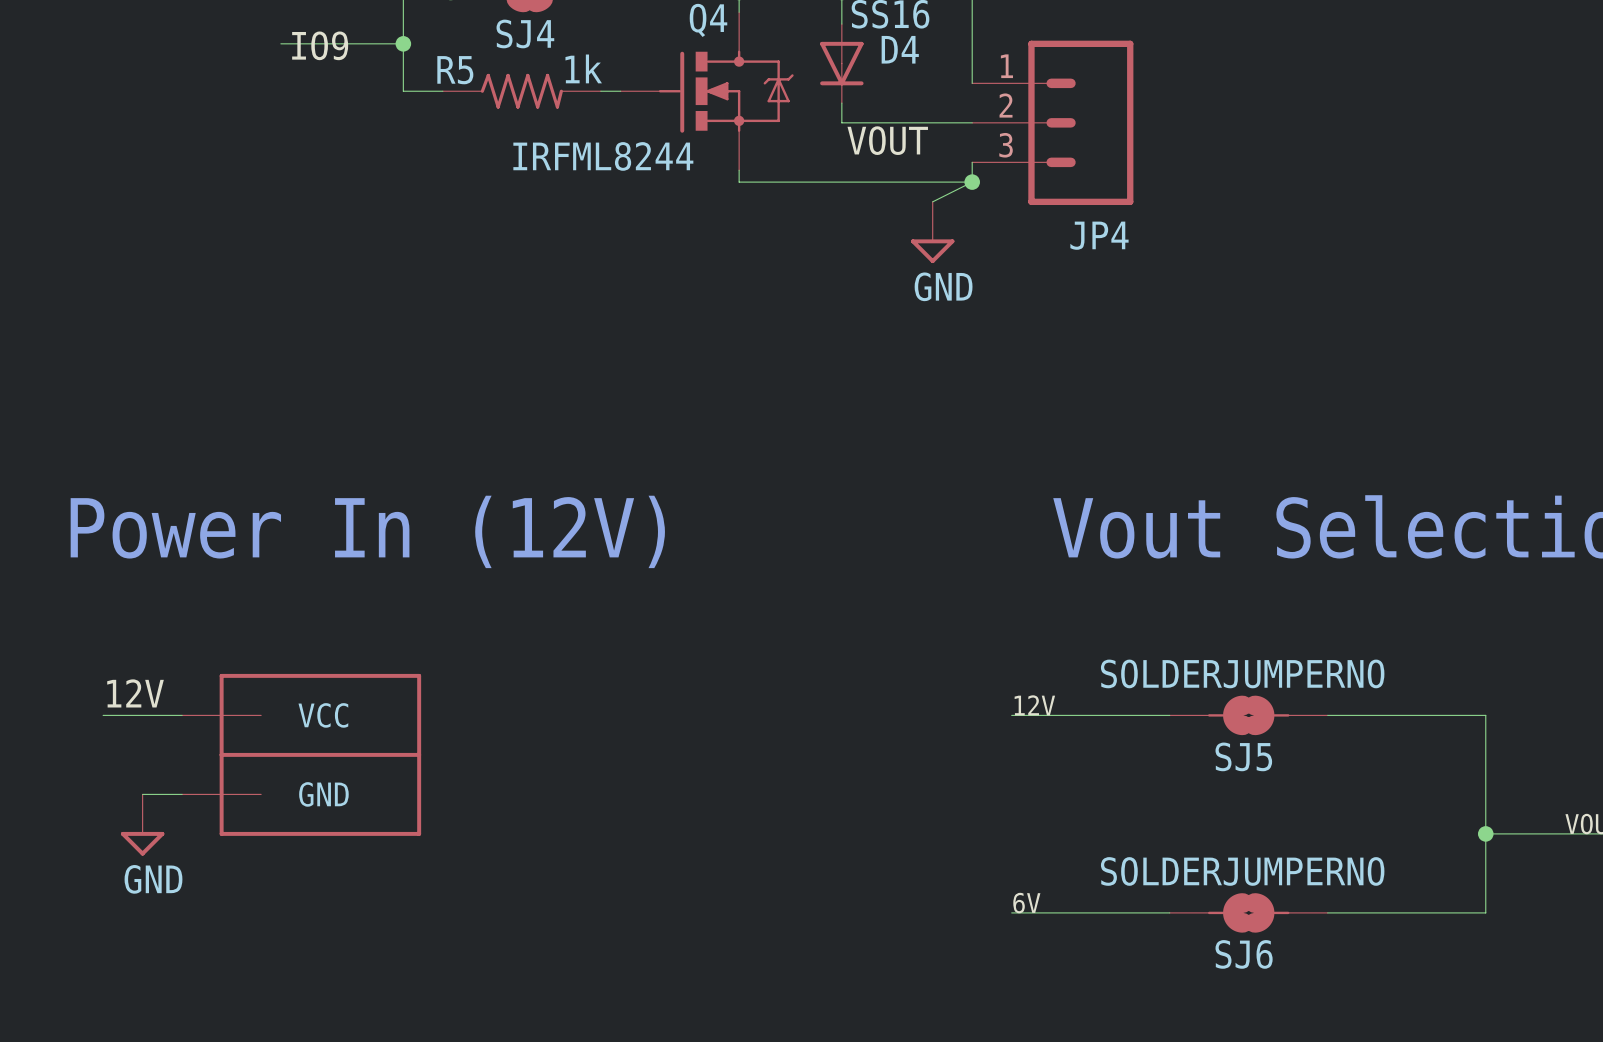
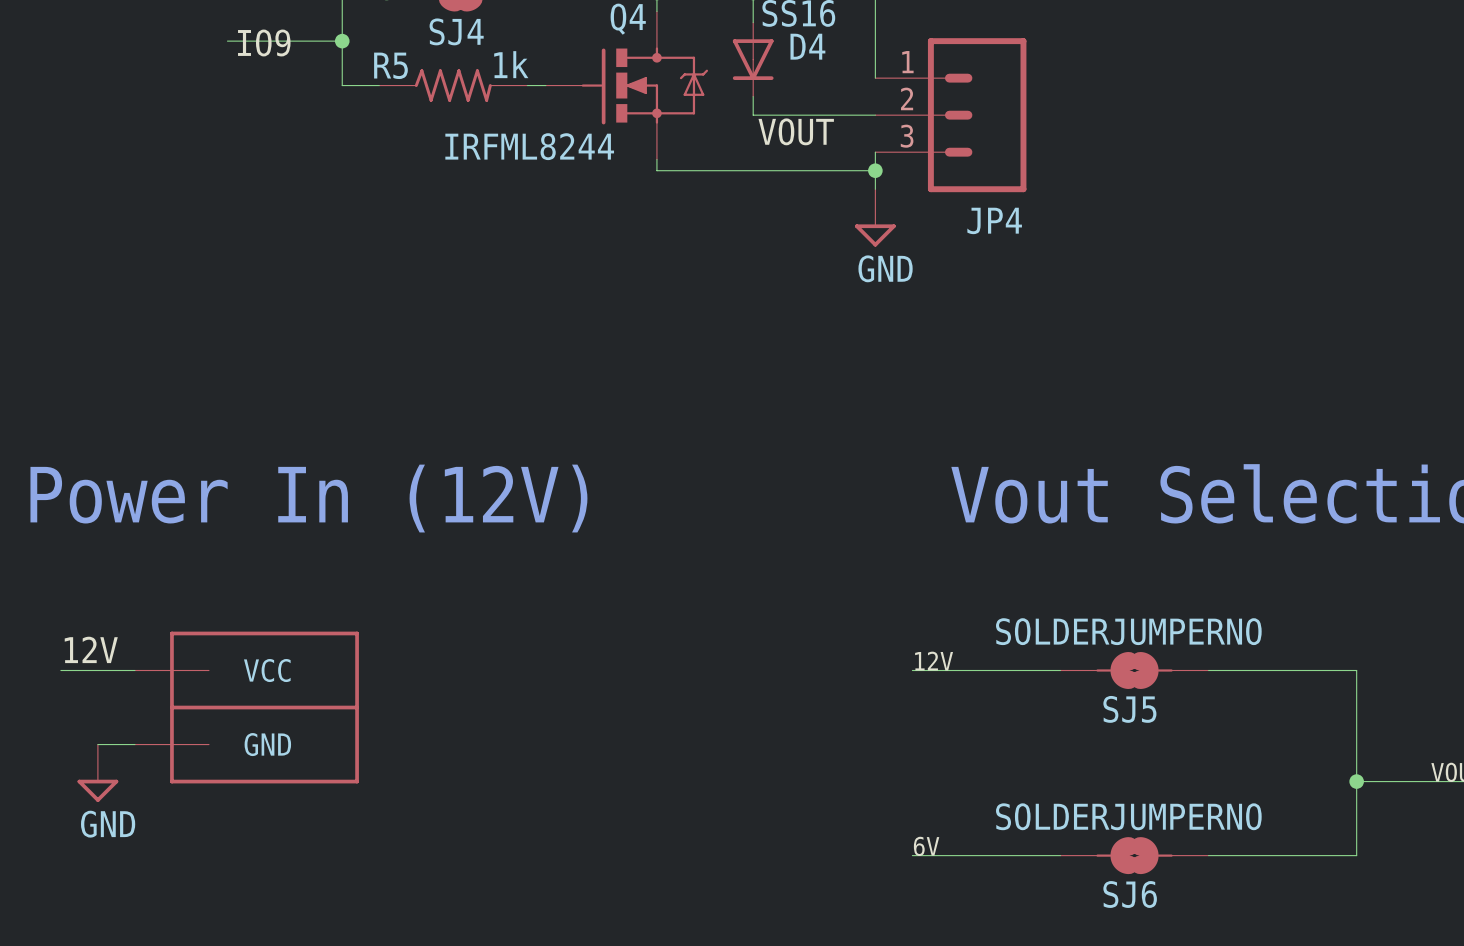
wire: (972, 182) (932, 201) -> (875, 170) (875, 189)
power symbol position: GND (932, 232) -> GND (875, 217)

